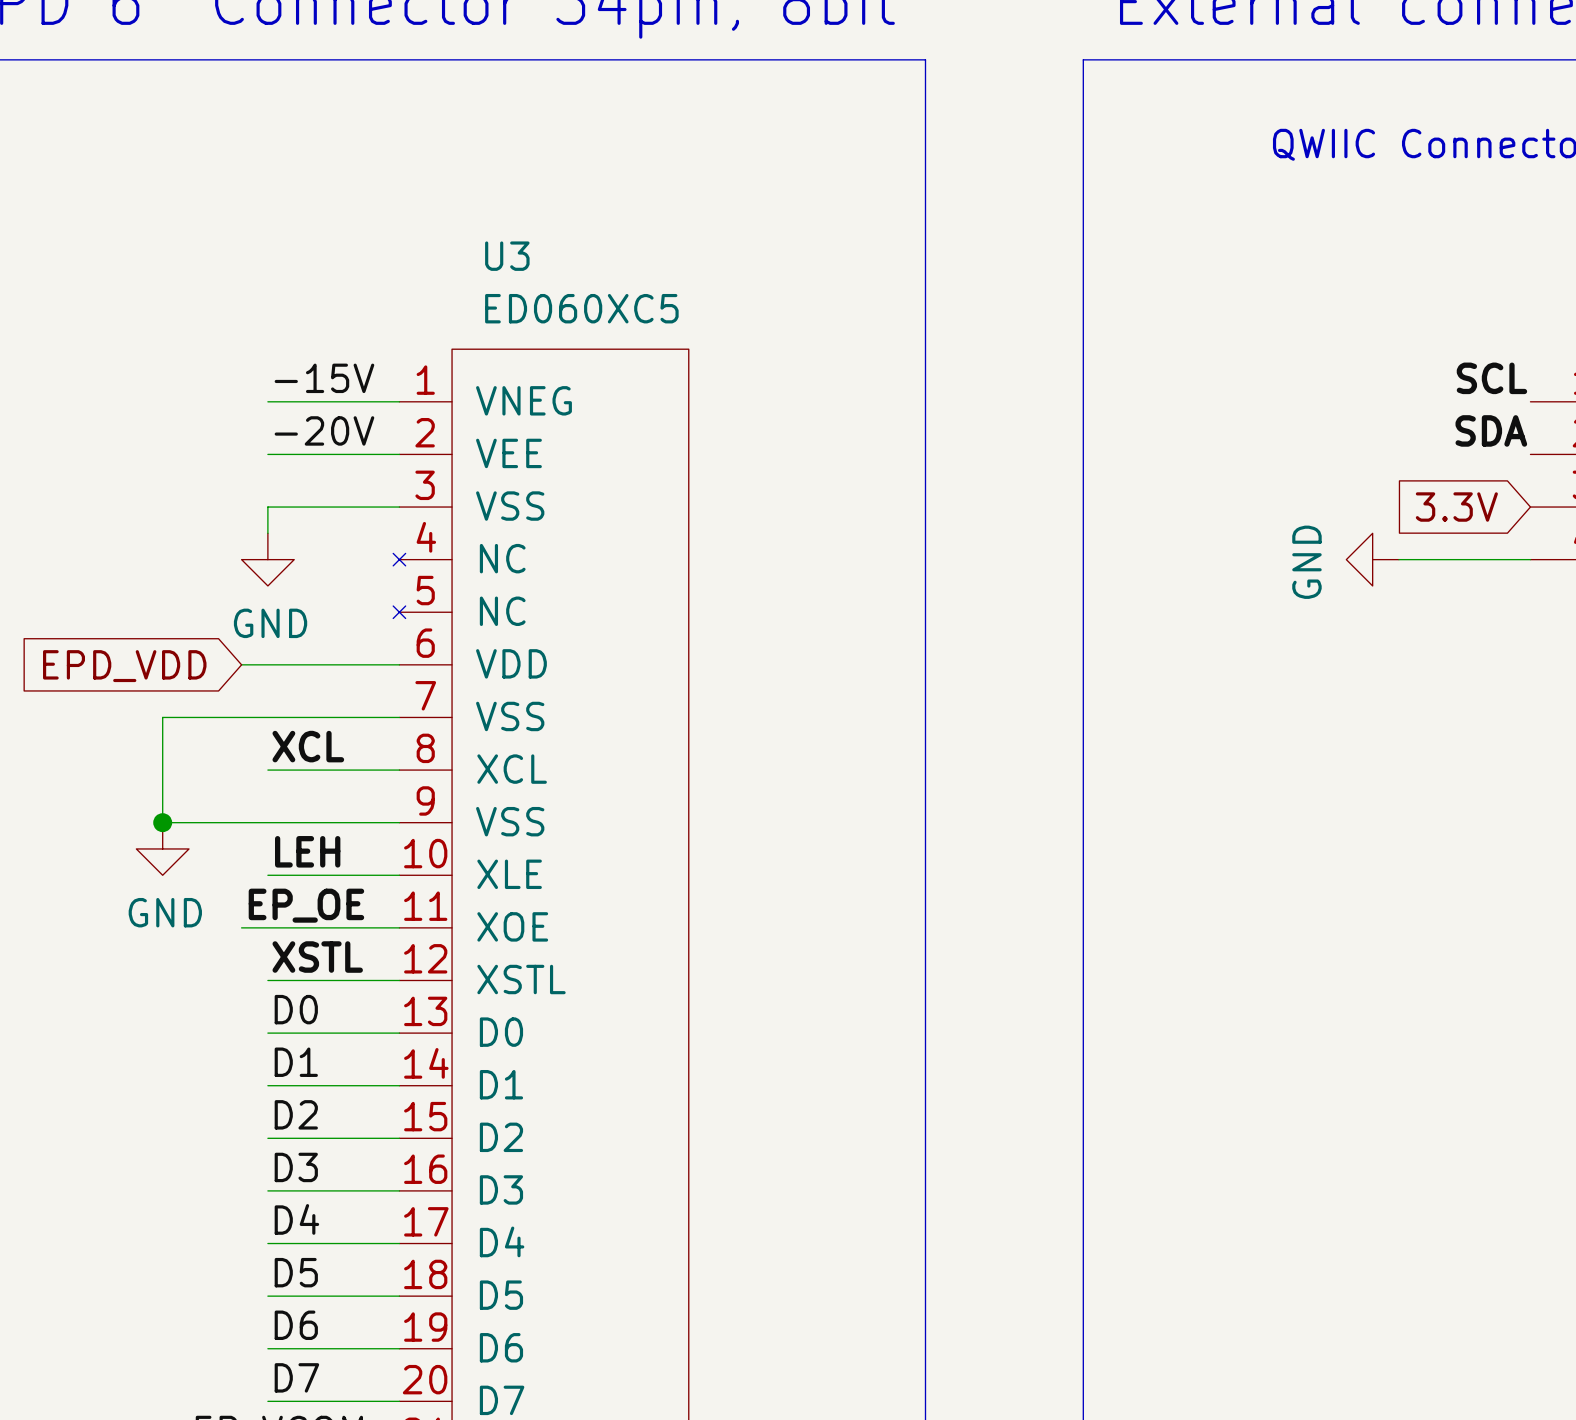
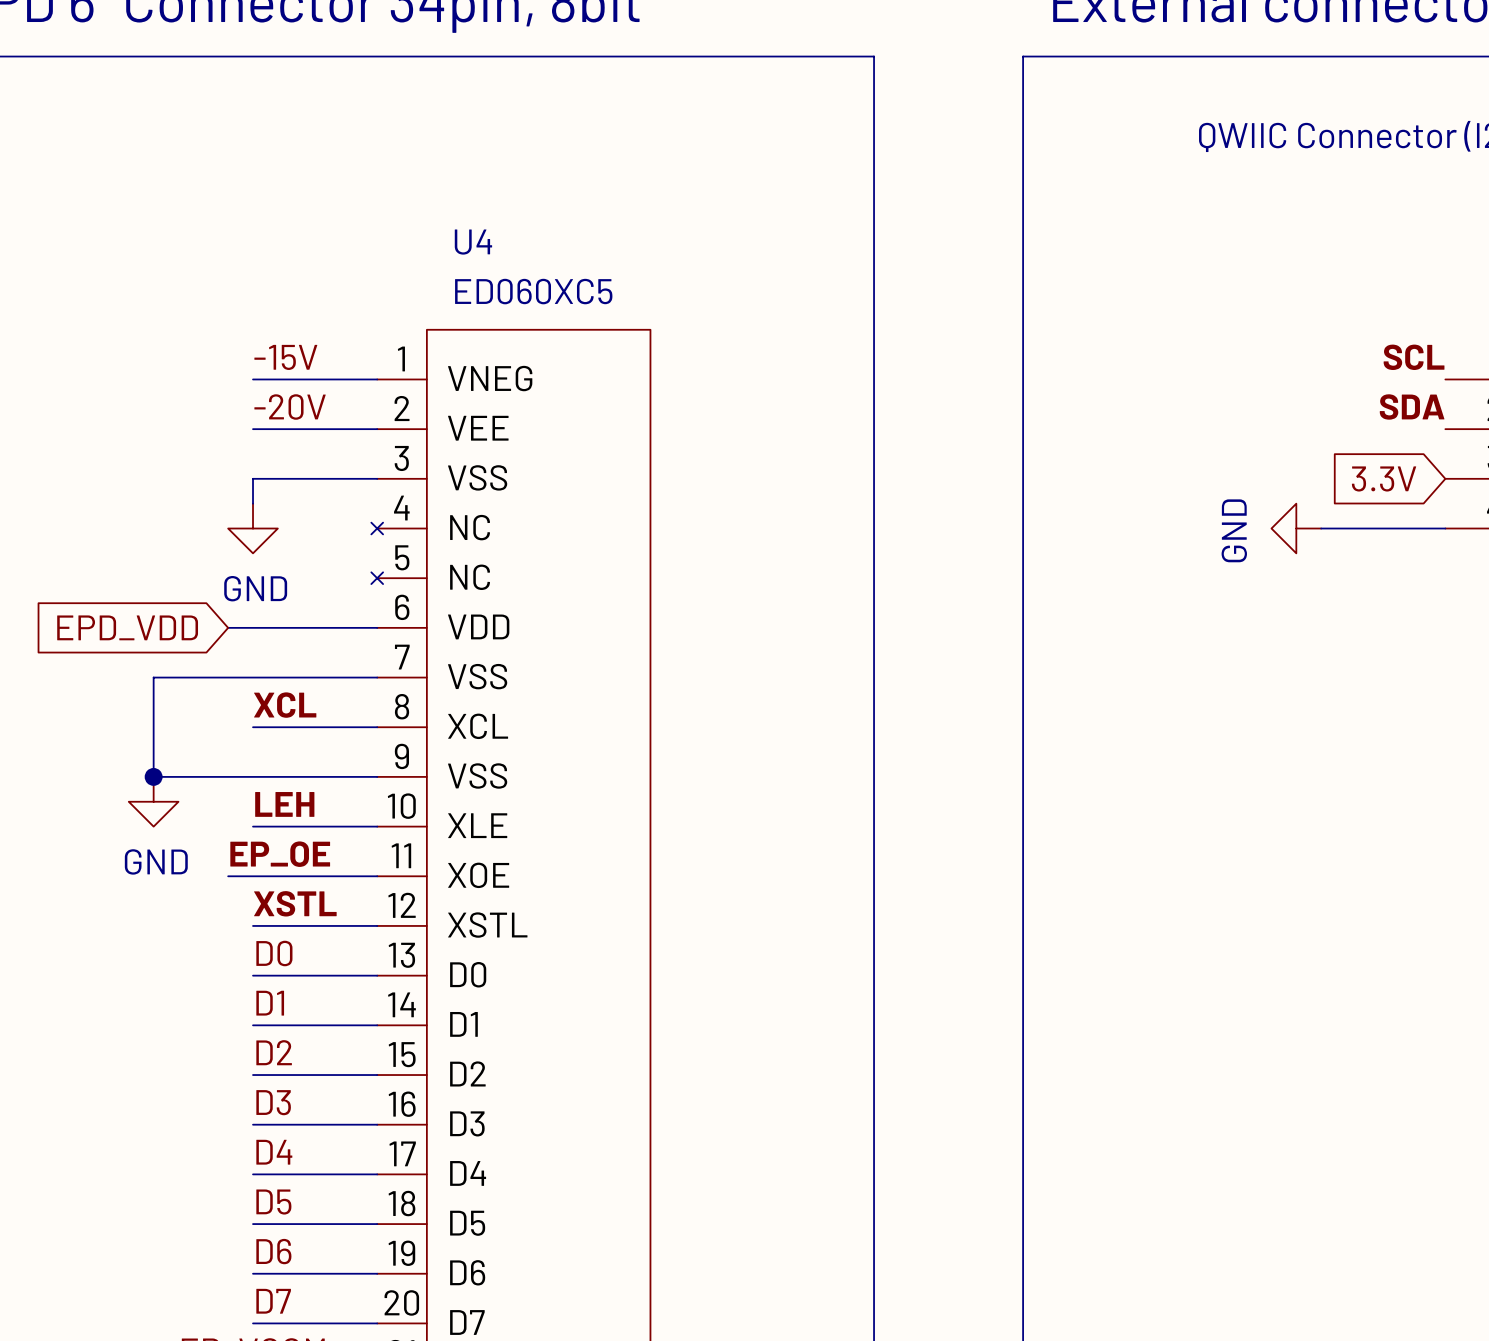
U3 name: U3 (507, 256) -> U4 (473, 242)

